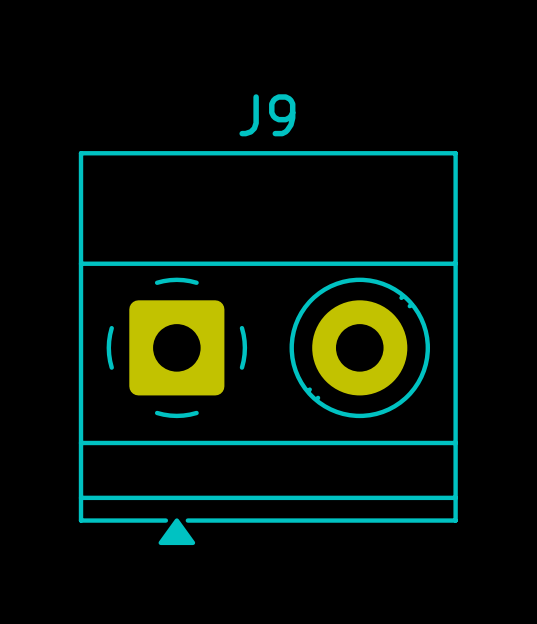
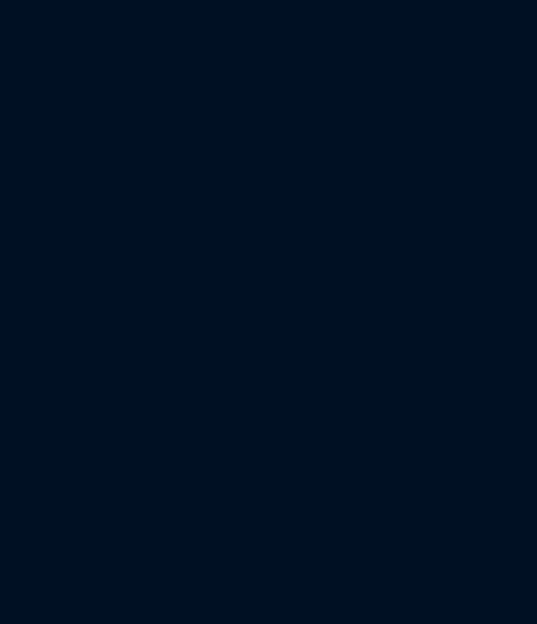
J9: (268, 348) -> none

